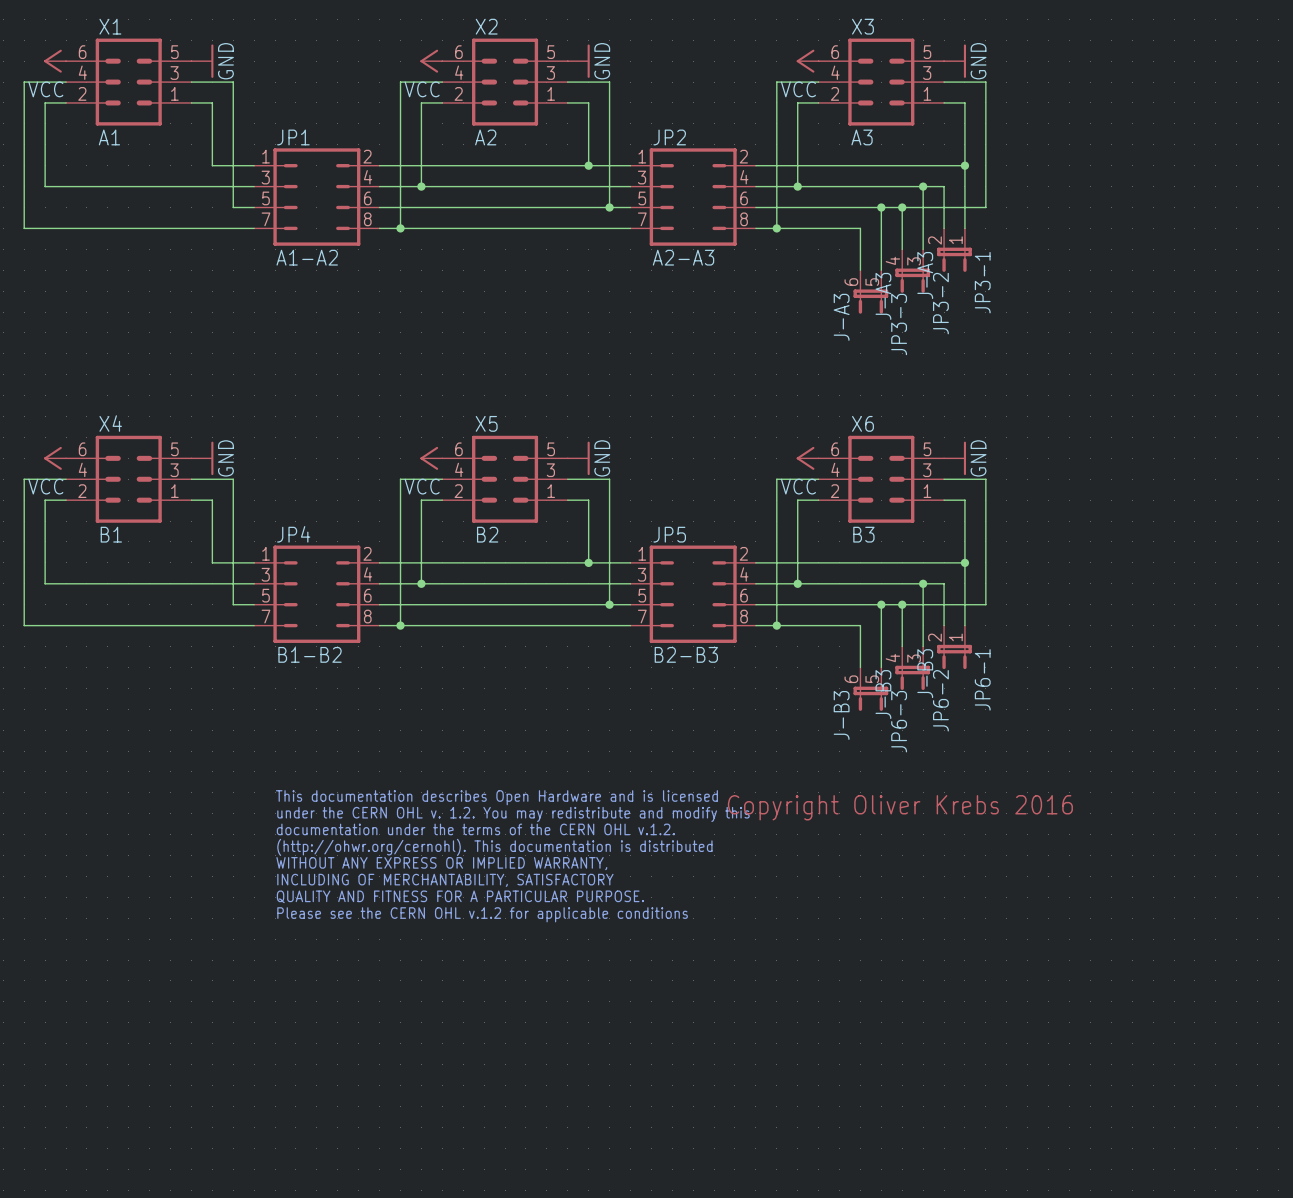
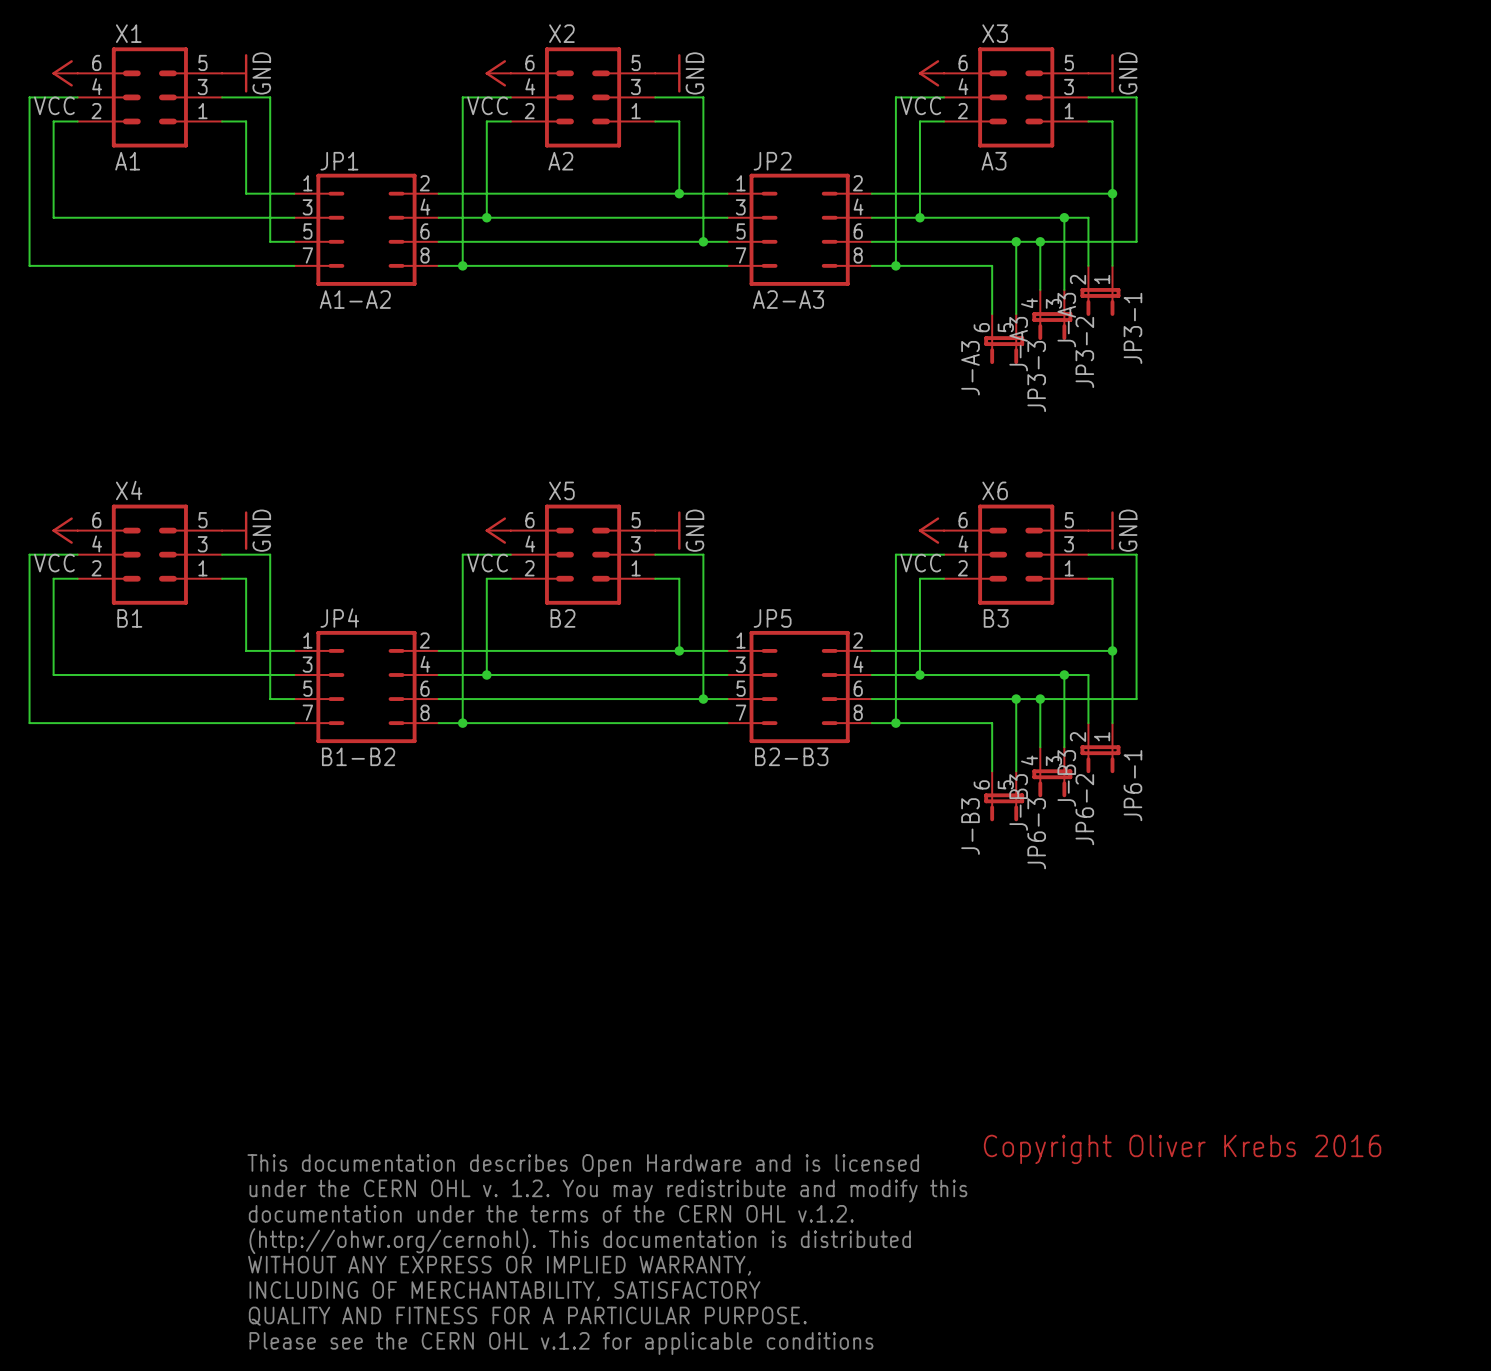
text: This documentation describes Open Hardware and is licensed (496, 797) -> none
text: Copyright Oliver Krebs 2016 (900, 807) -> none
text: under the CERN OHL v. 1.2. You may redistribute and modify this (513, 814) -> none
text: documentation under the terms of the CERN OHL v.1.2. (475, 829) -> none
text: (http://ohwr.org/cernohl). This documentation is distributed (494, 847) -> none
text: WITHOUT ANY EXPRESS OR IMPLIED WARRANTY, (441, 863) -> none
text: INCLUDING OF MERCHANTABILITY, SATISFACTORY (445, 880) -> none
text: QUALITY AND FITNESS FOR A PARTICULAR PURPOSE. (460, 896) -> none
text: Please see the CERN OHL v.1.2 for applicable conditions (482, 914) -> none
text: none -> Copyright Oliver Krebs 2016 (1182, 1149)
text: none -> This documentation describes Open Hardware and is licensed (583, 1165)
text: none -> under the CERN OHL v. 1.2. You may redistribute and modify this (608, 1191)
text: none -> documentation under the terms of the CERN OHL v.1.2. (551, 1213)
text: none -> (http://ohwr.org/cernohl). This documentation is distributed (580, 1241)
text: none -> WITHOUT ANY EXPRESS OR IMPLIED WARRANTY, (499, 1265)
text: none -> INCLUDING OF MERCHANTABILITY, SATISFACTORY (504, 1291)
text: none -> QUALITY AND FITNESS FOR A PARTICULAR PURPOSE. (527, 1316)
text: none -> Please see the CERN OHL v.1.2 for applicable conditions (561, 1343)

